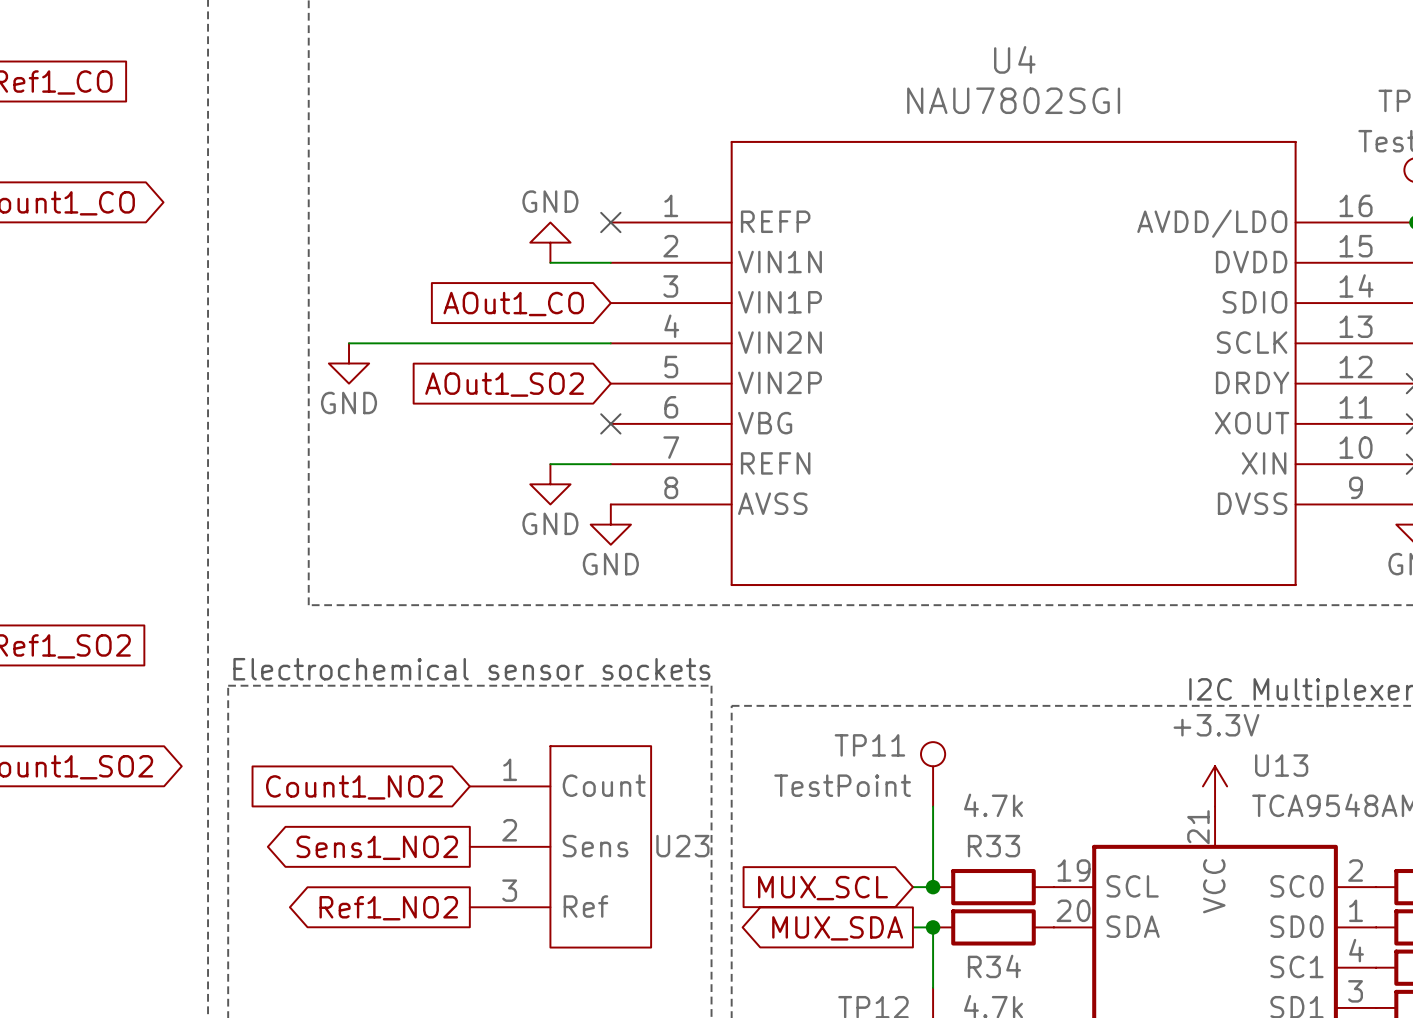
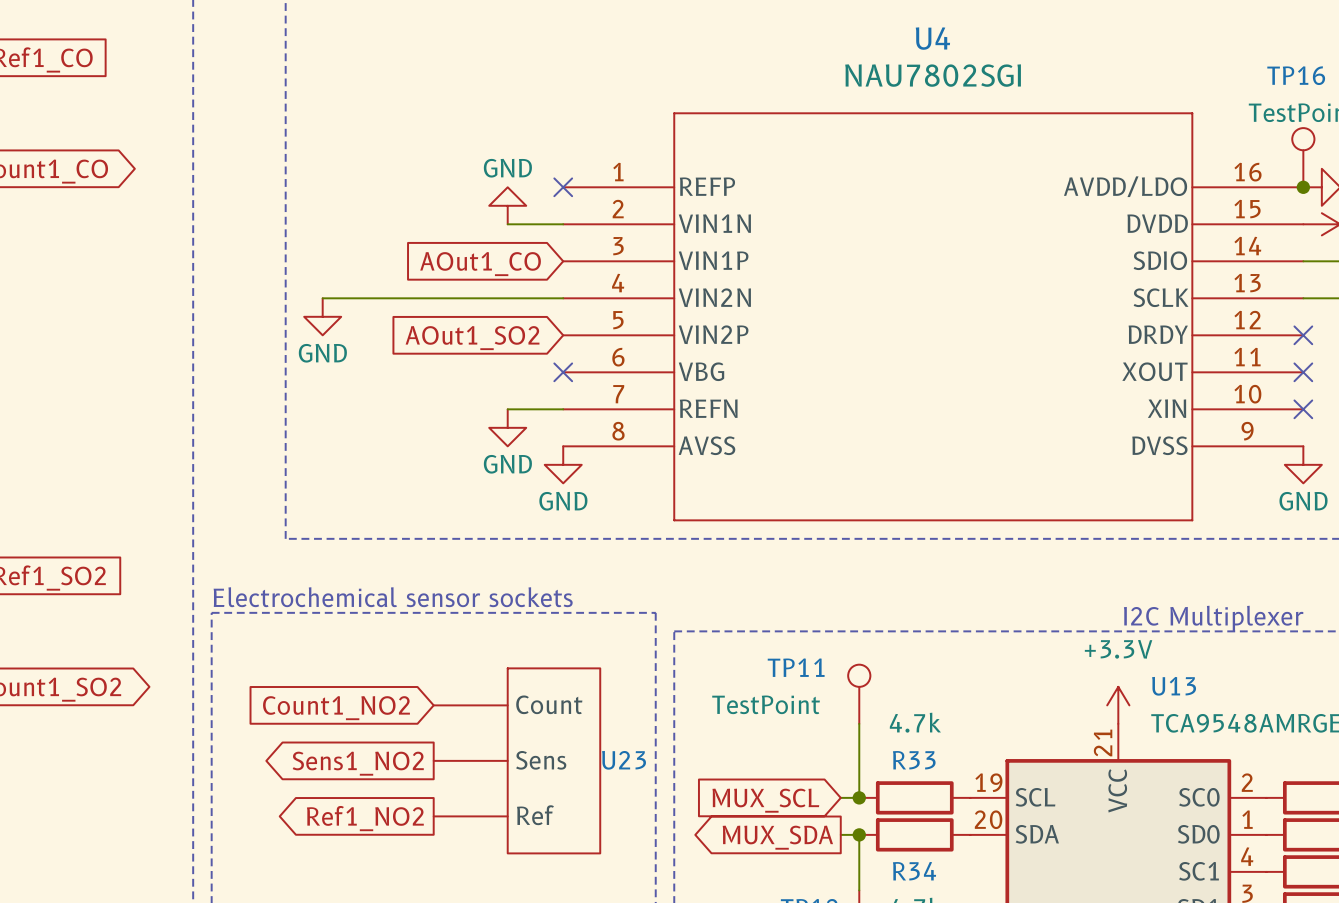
U23 pin number: 1 (510, 769) -> none
U23 pin number: 2 (509, 830) -> none
U23 pin number: 3 (509, 890) -> none

